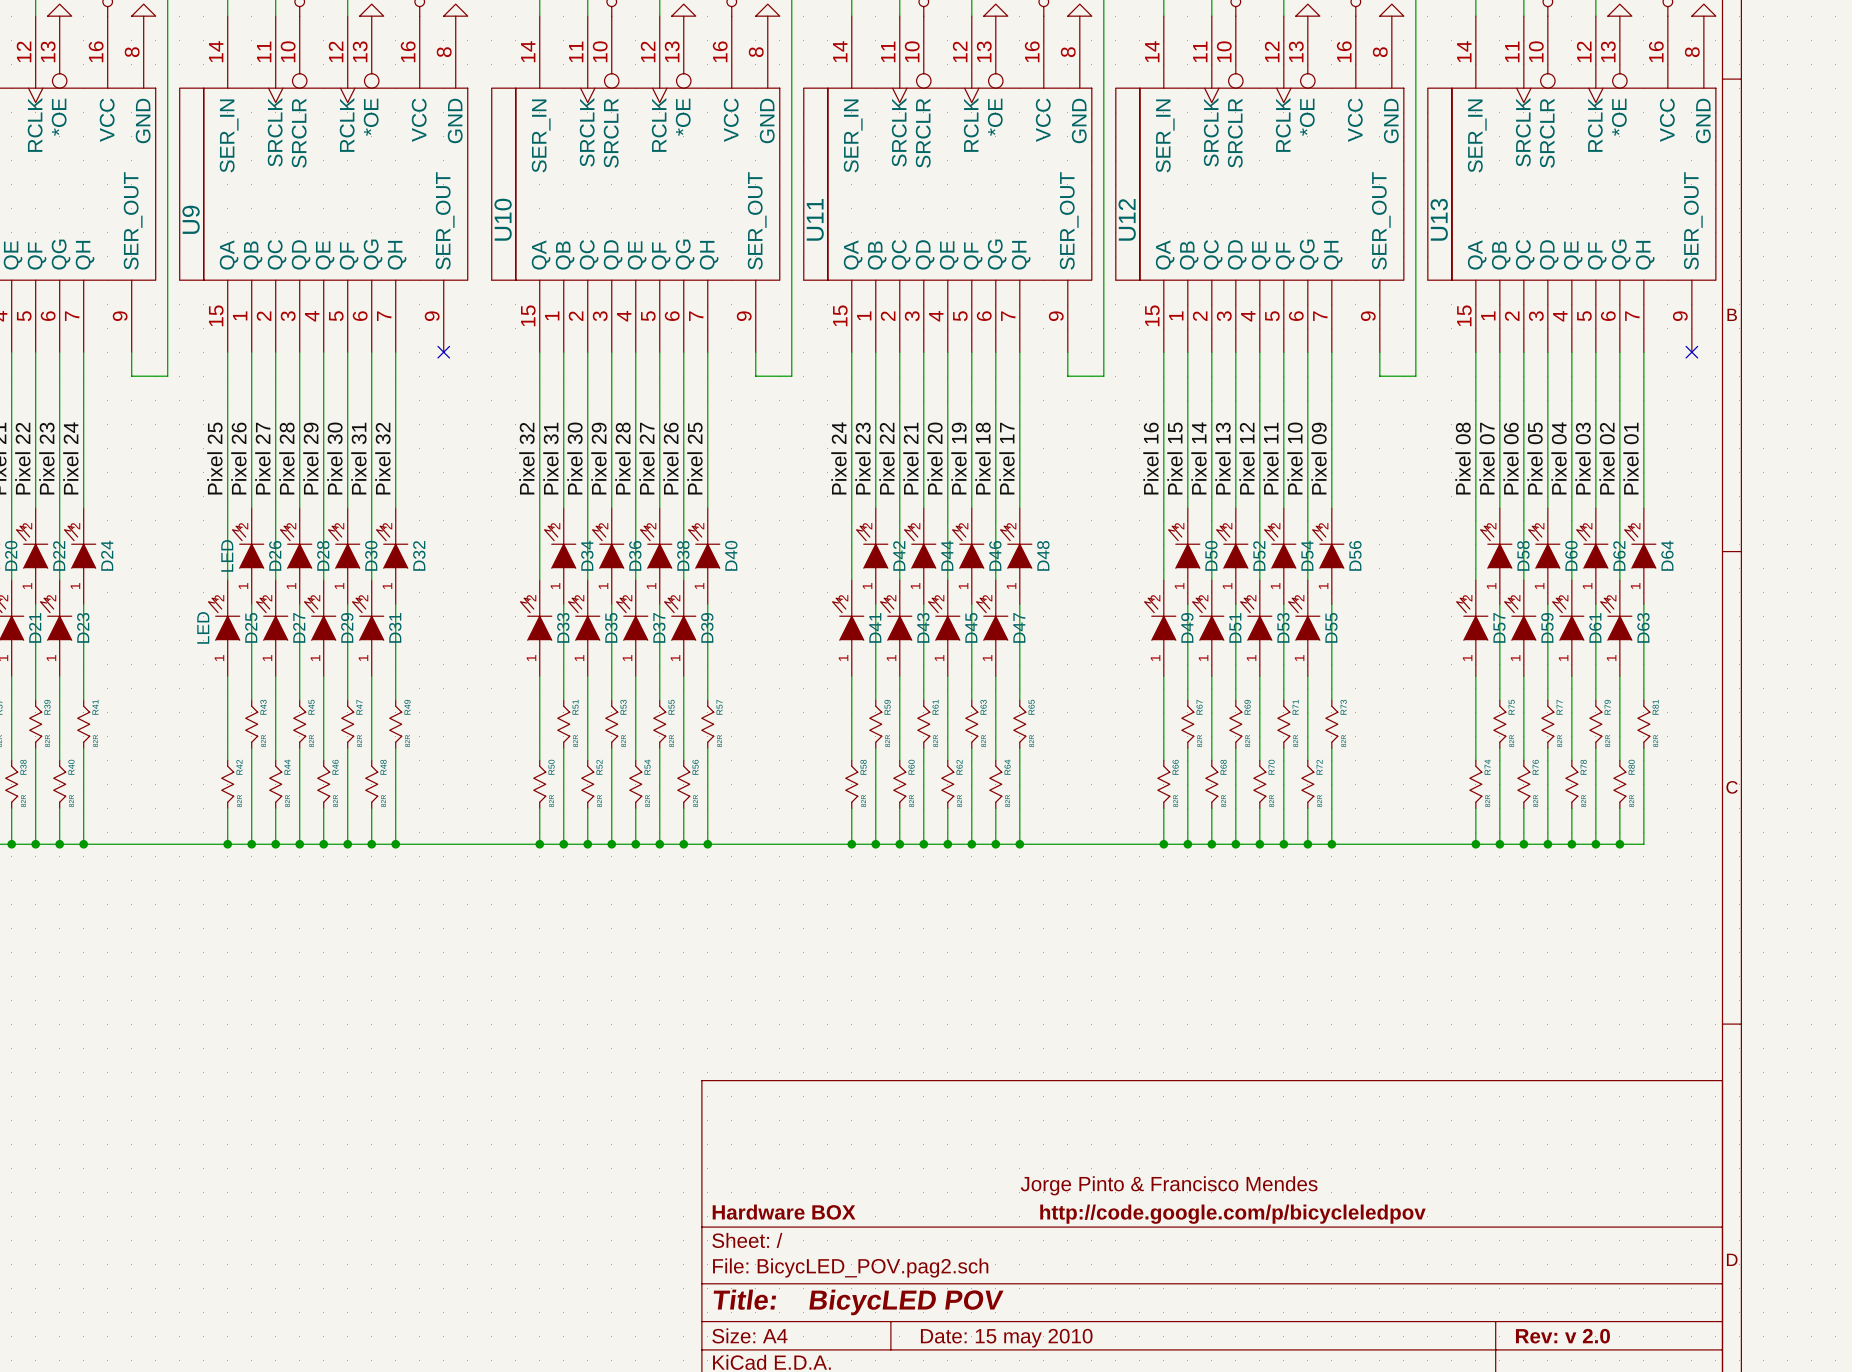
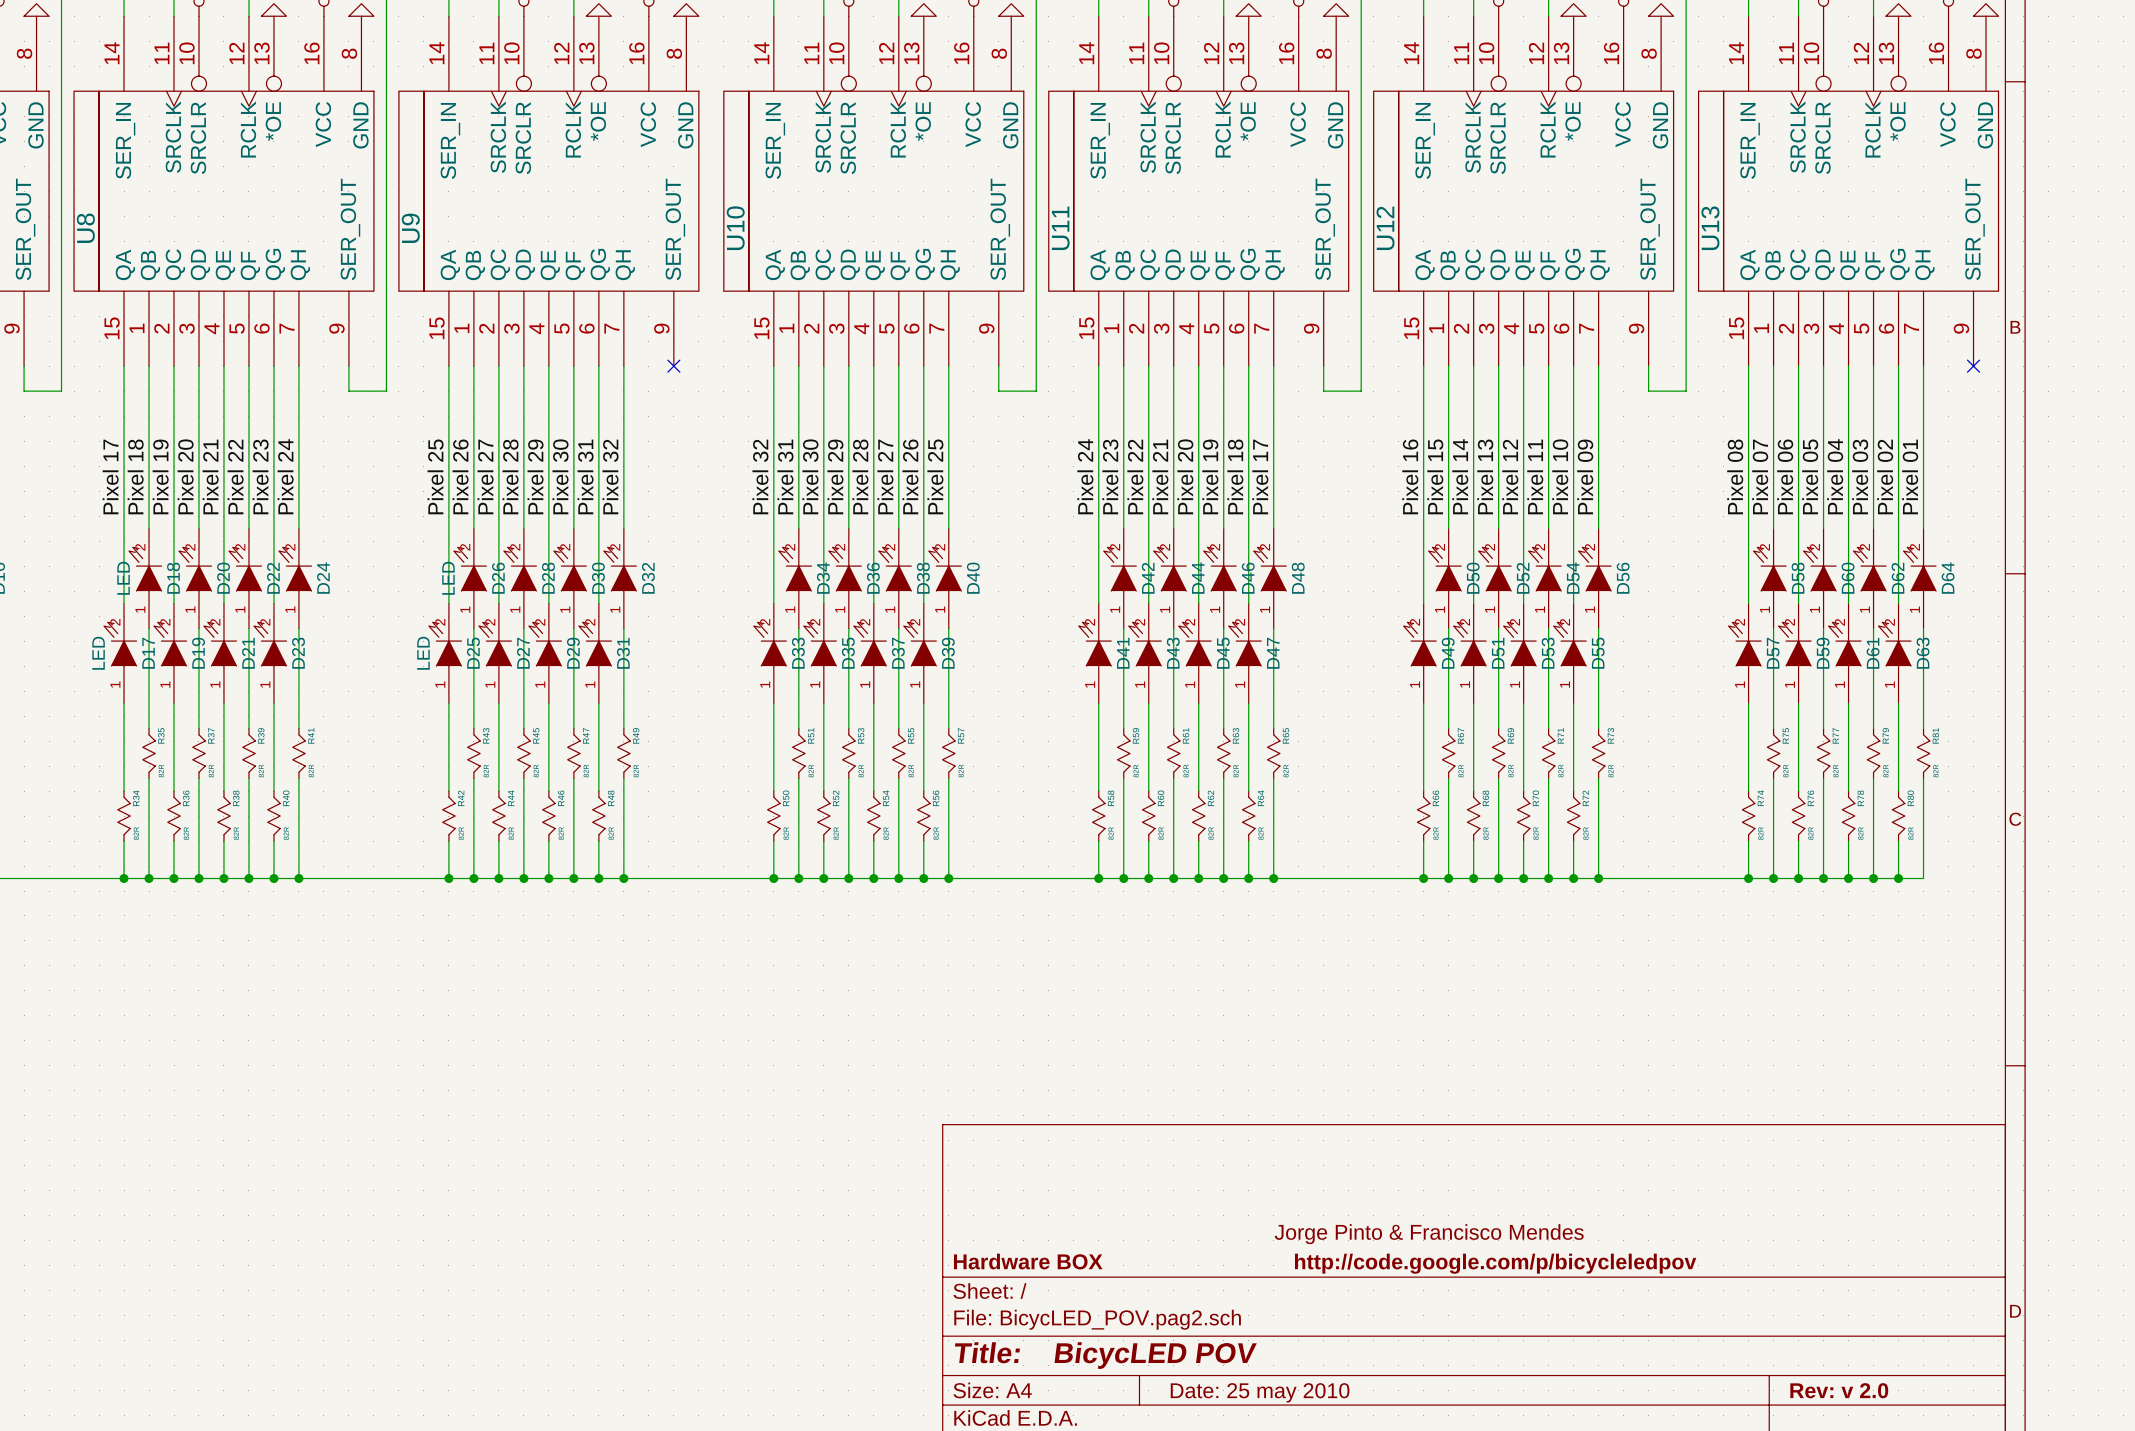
title block: Date: 15 may 2010 (1006, 1338) -> Date: 25 may 2010 (1260, 1392)

